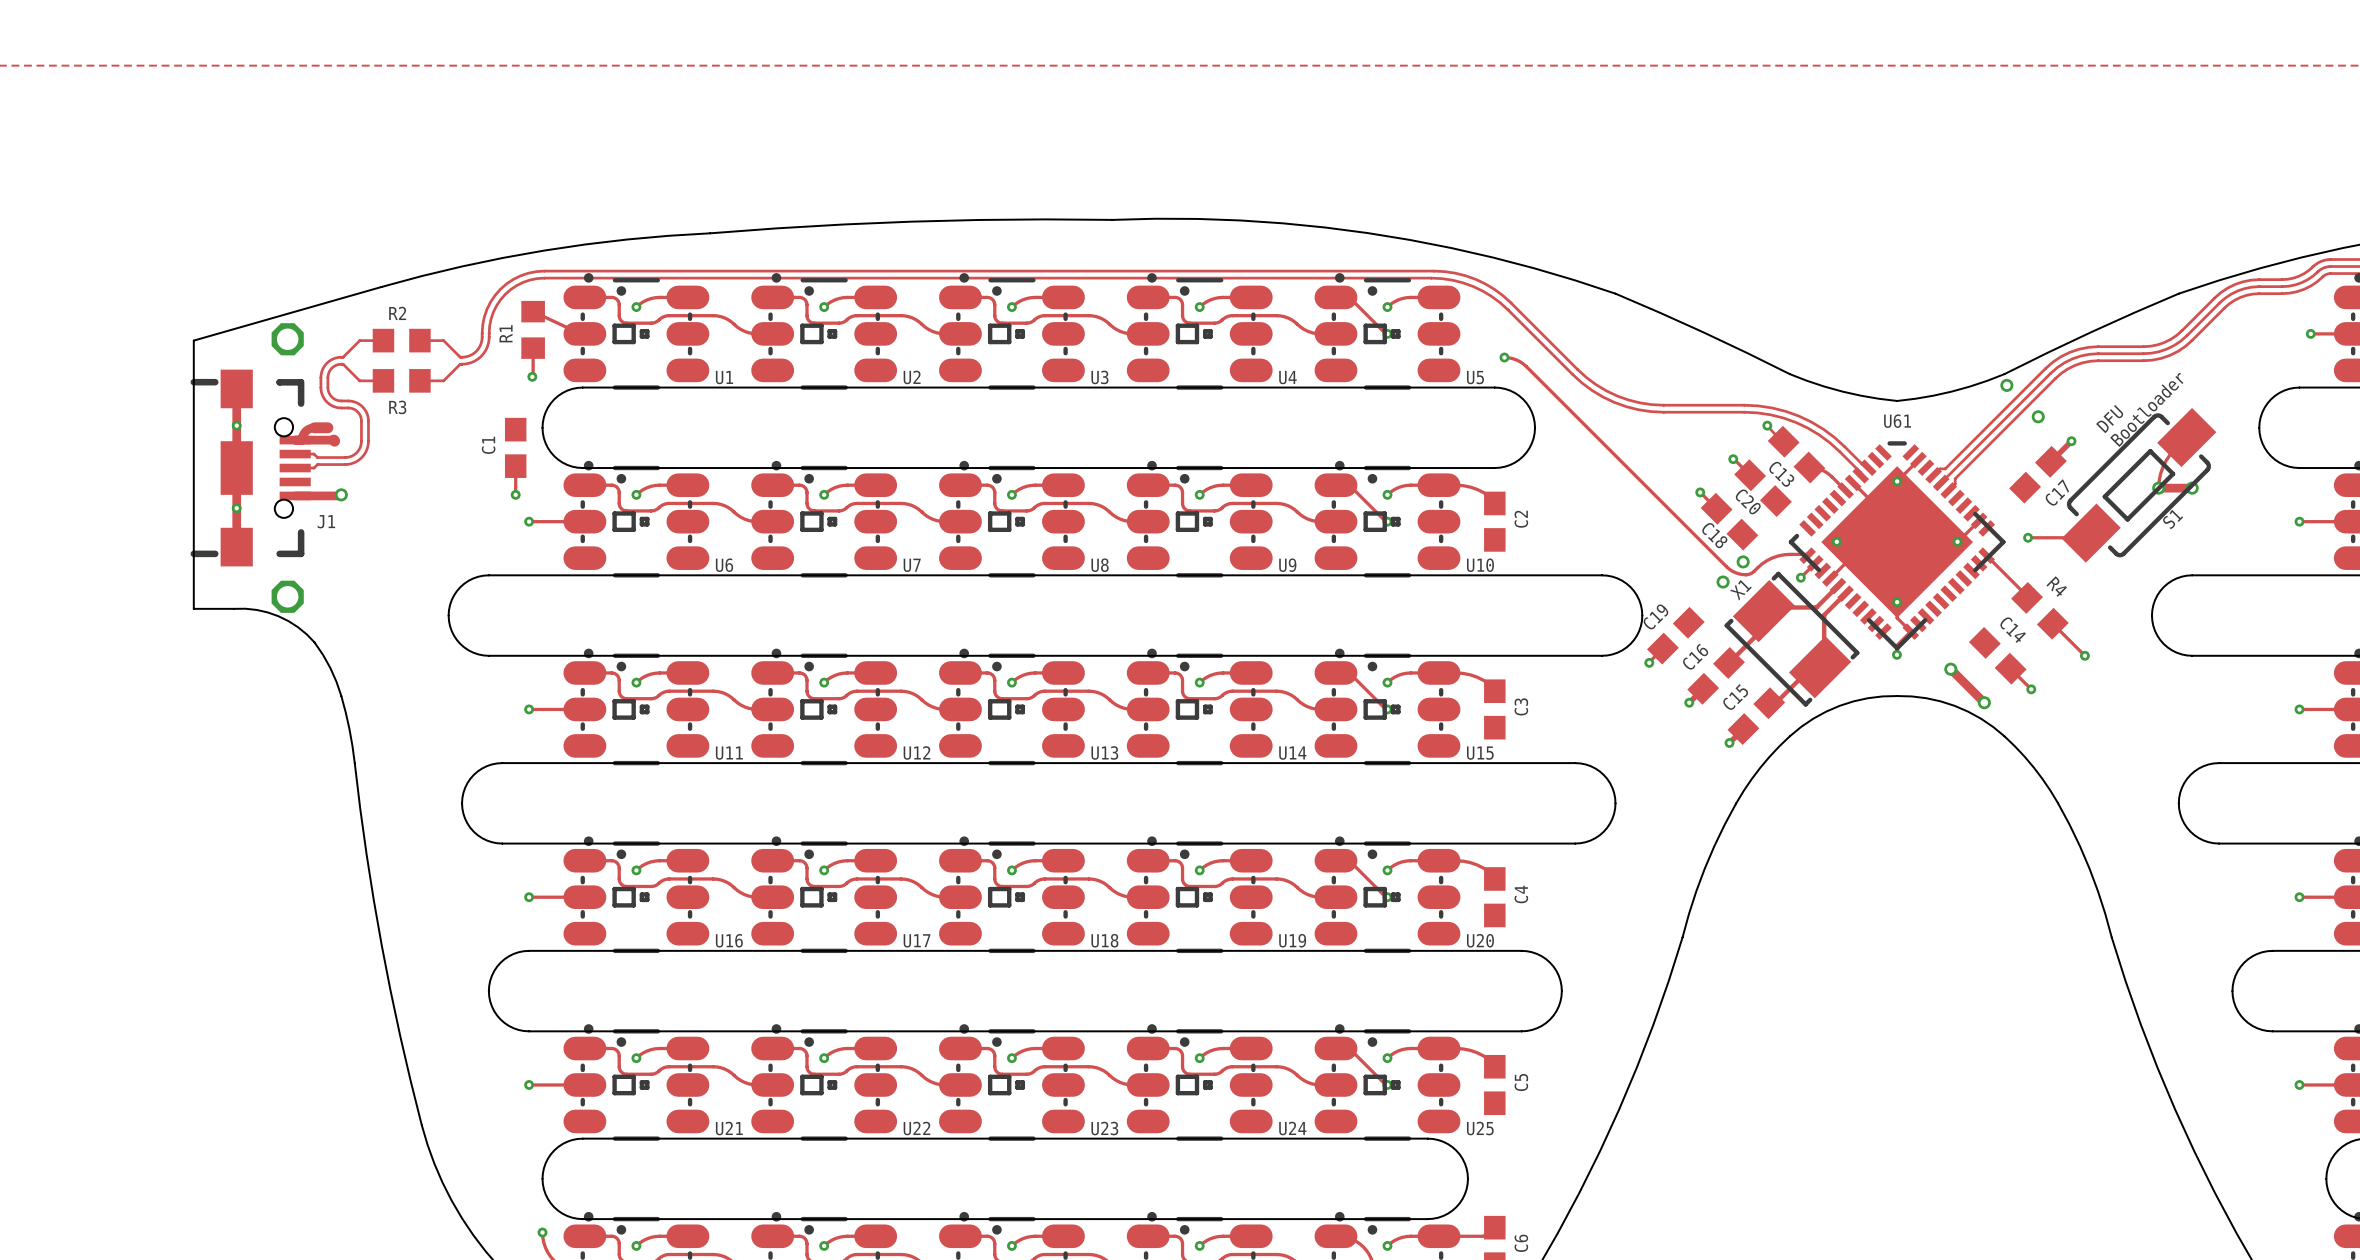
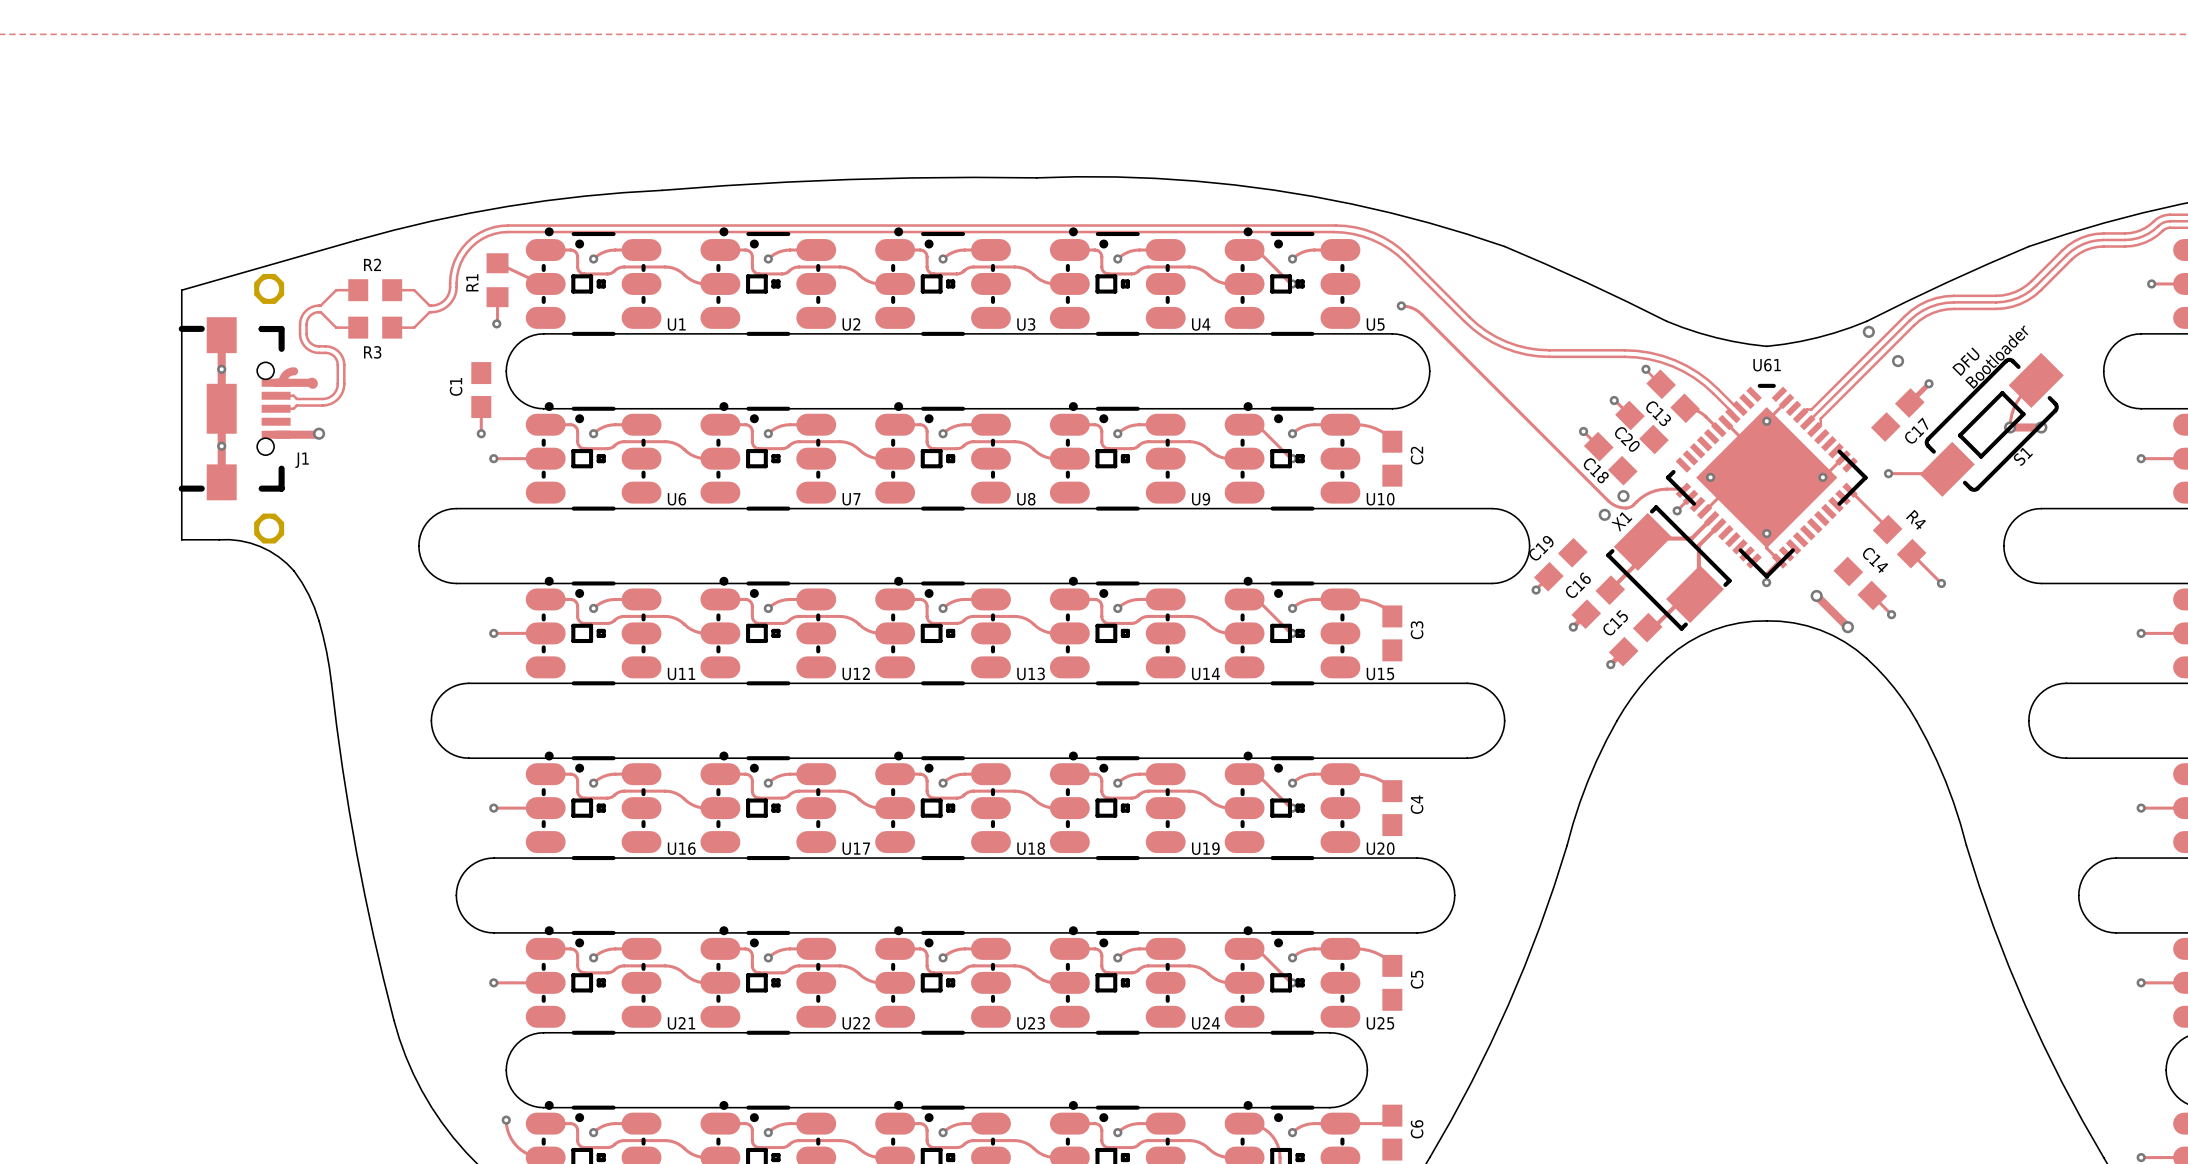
track: (314, 427) (327, 427) -> none

